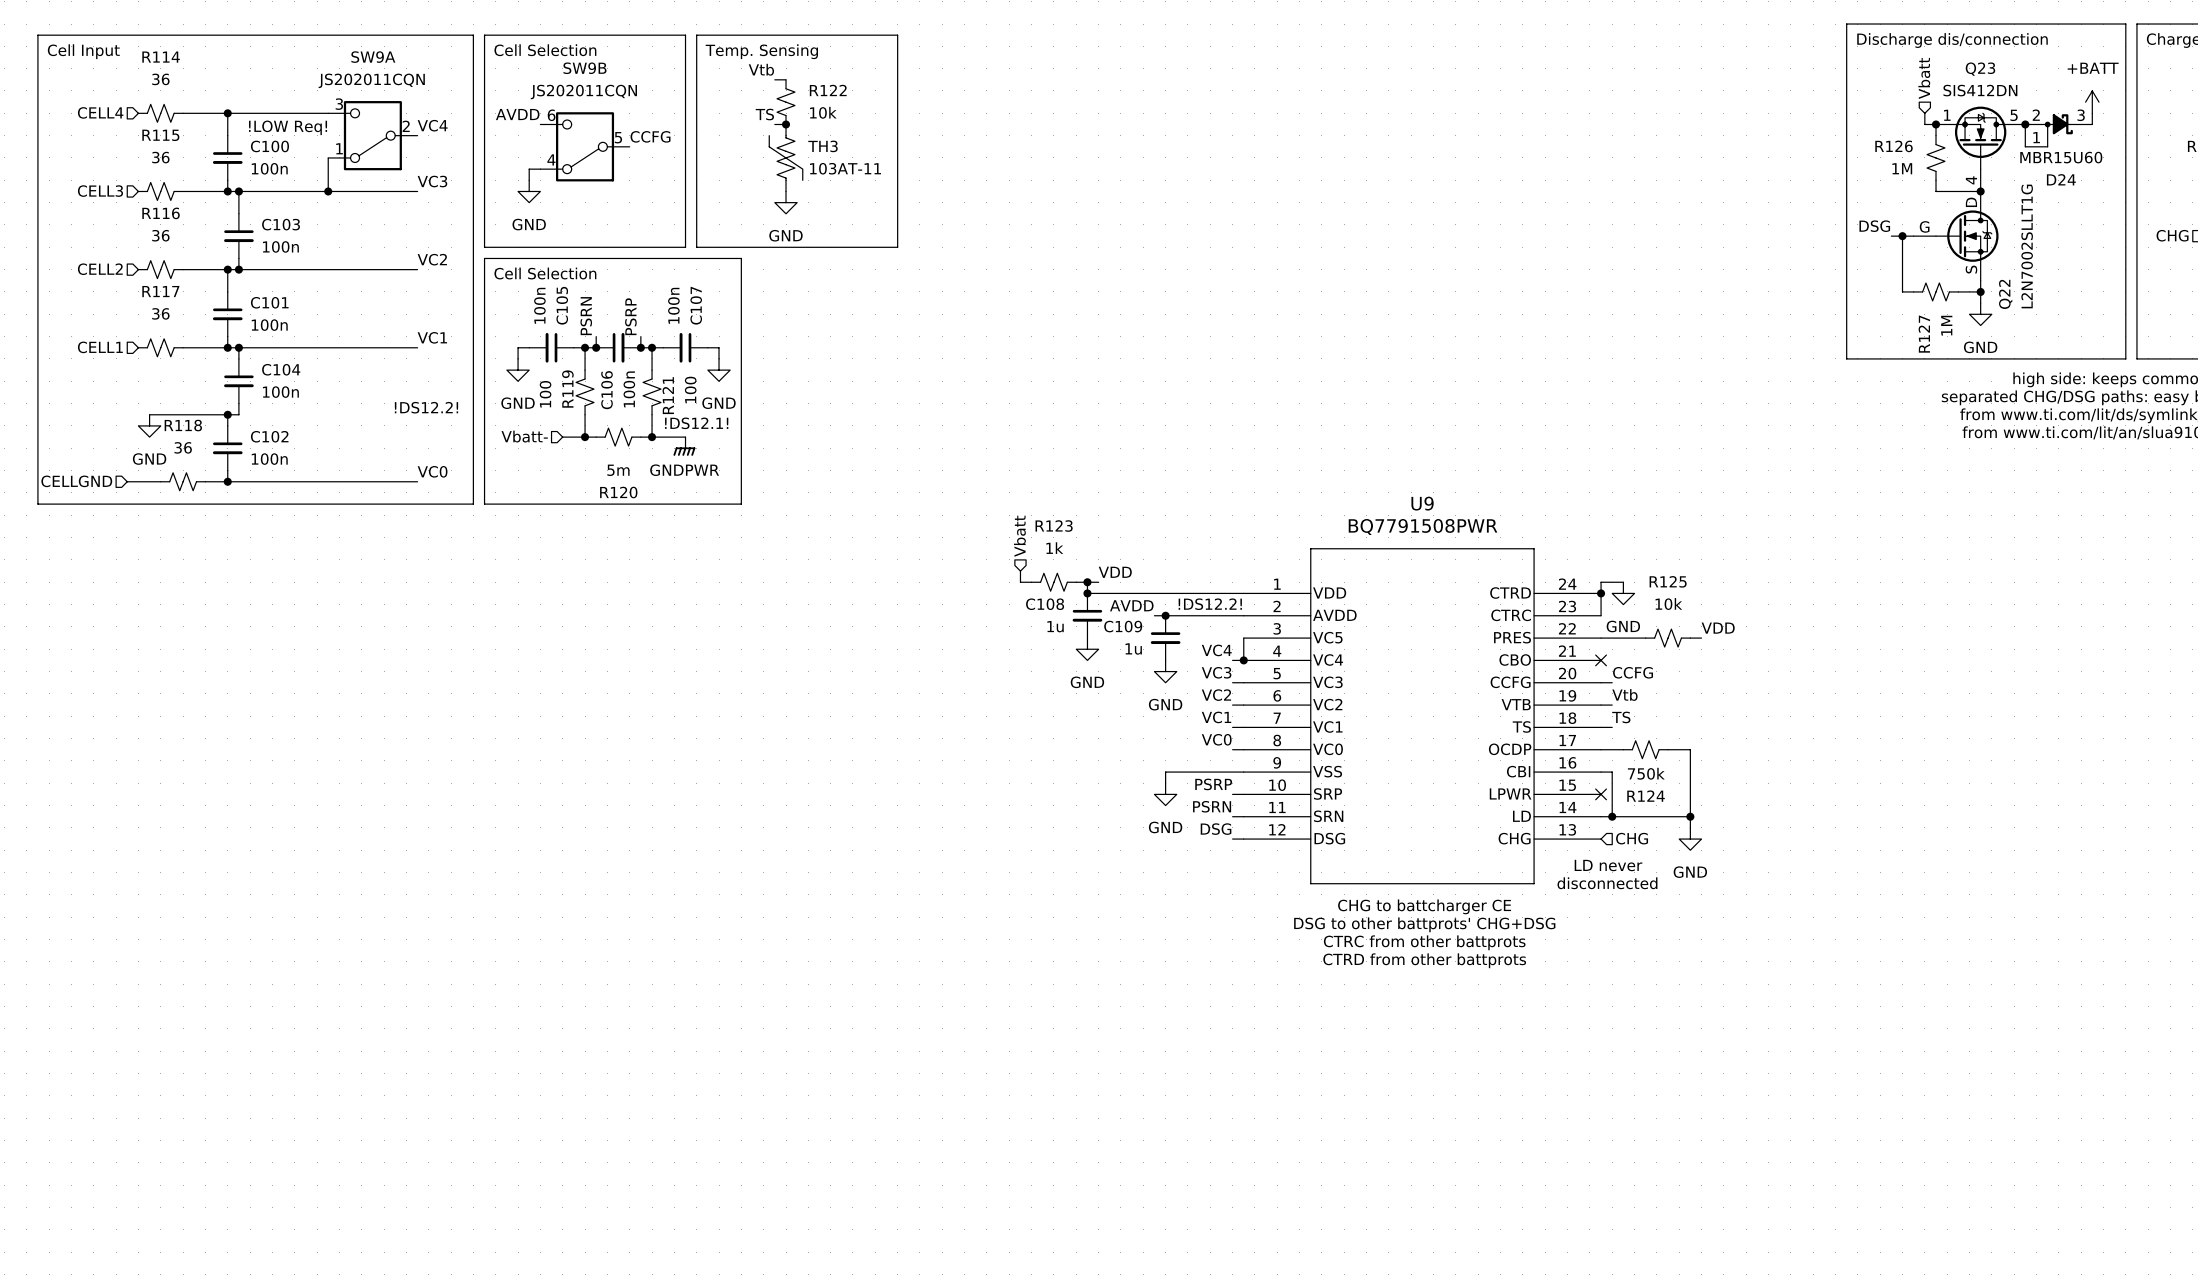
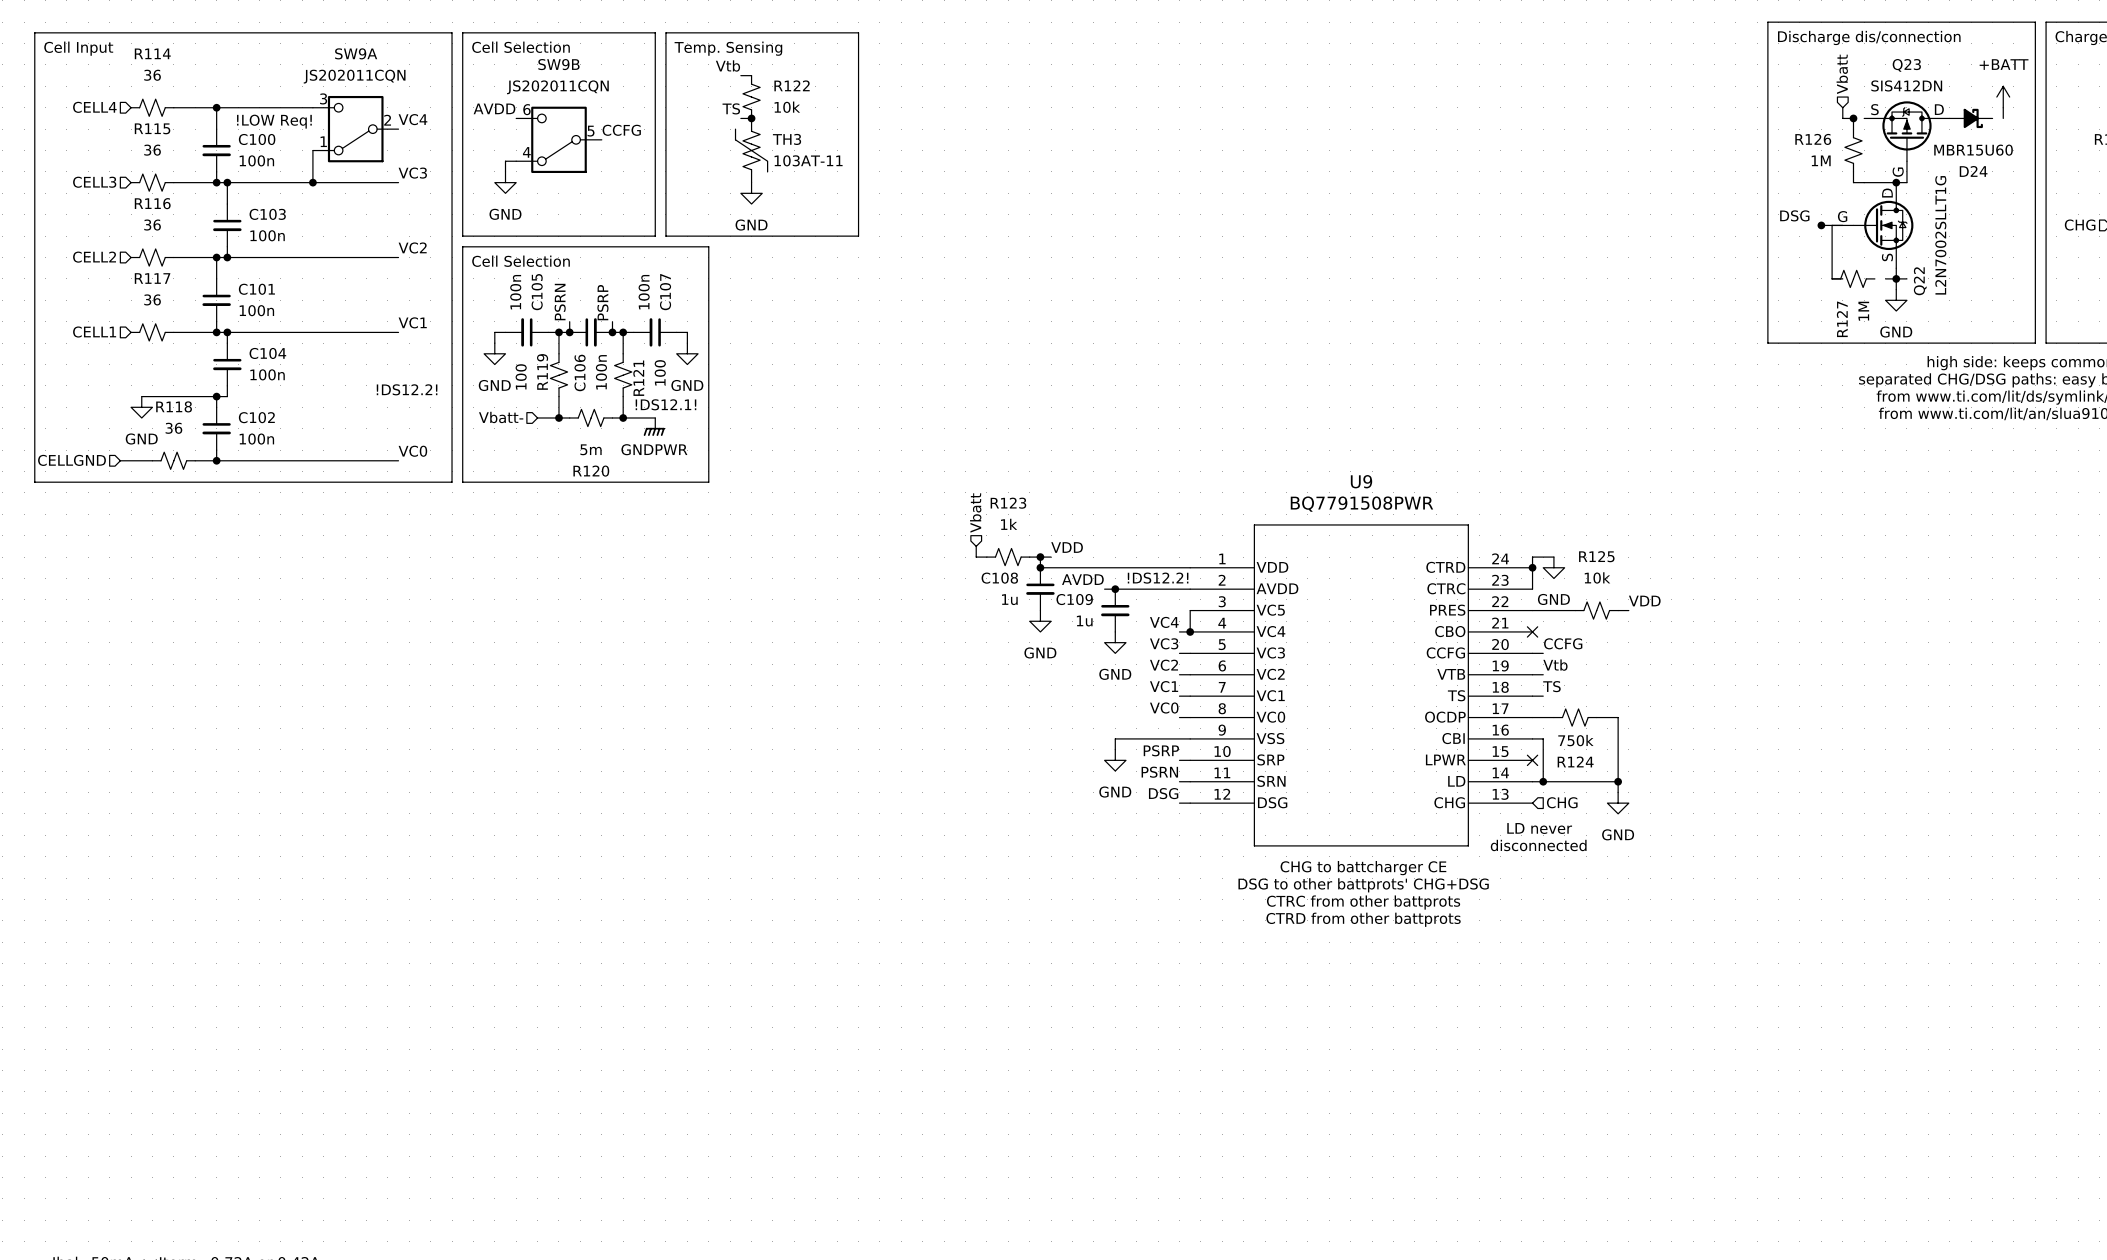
Q23 symbol: [1936, 106, 2026, 192] -> [1864, 101, 1950, 183]
D24 symbol: [2025, 114, 2093, 147] -> [1949, 108, 1993, 129]
wire: (2025, 124) (2025, 146) -> none
junction: (2025, 124) -> none
wire: none -> (1896, 182) (1906, 182)
wire: (1891, 236) (1902, 236) (1902, 291) (1913, 291) -> none
wire: none -> (1842, 225) (1832, 225) (1832, 278) (1842, 278)
wire: (1958, 291) (1969, 291) -> (1896, 278) (1906, 278)

